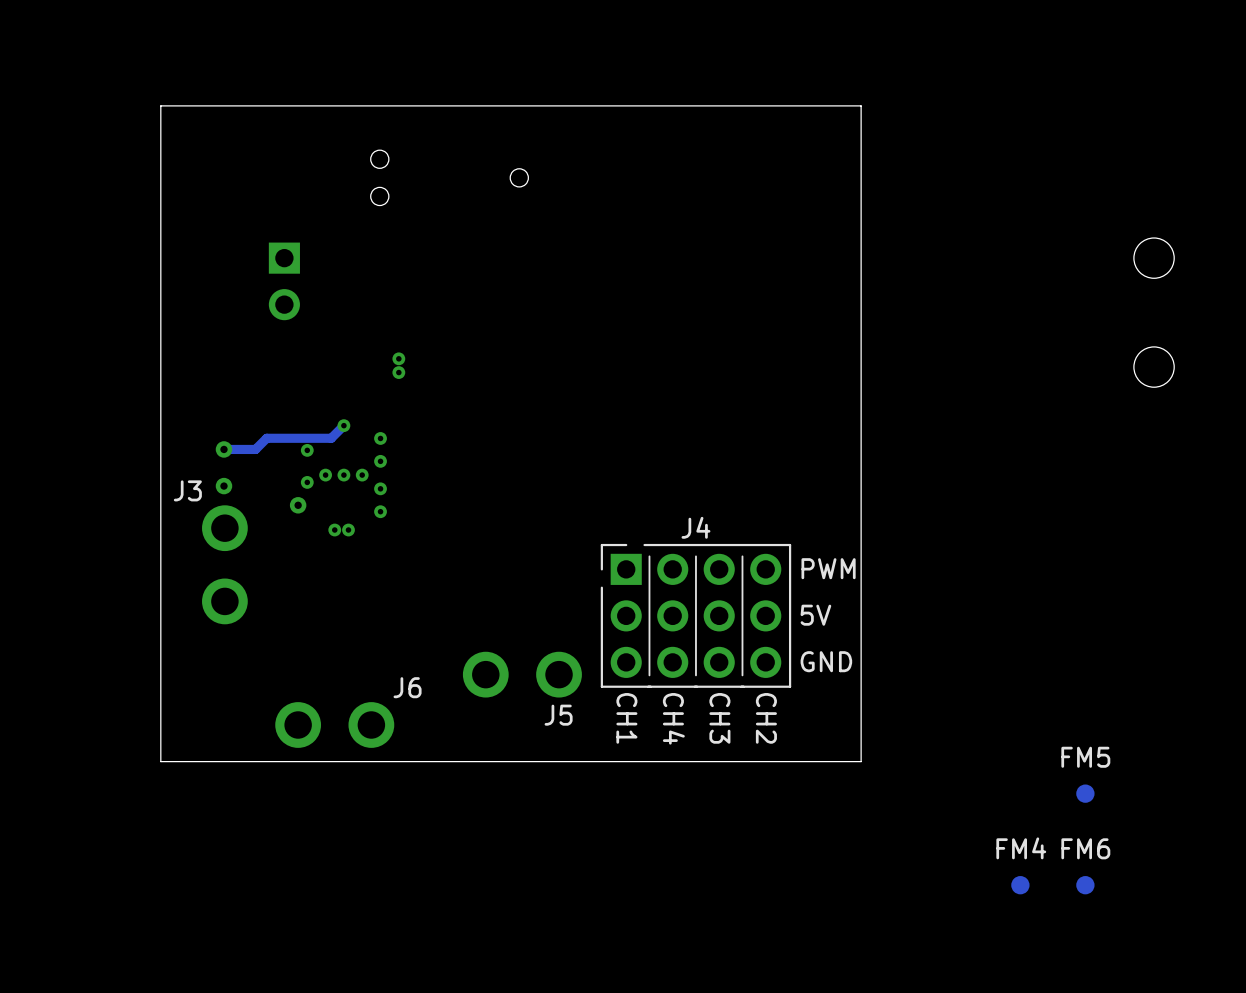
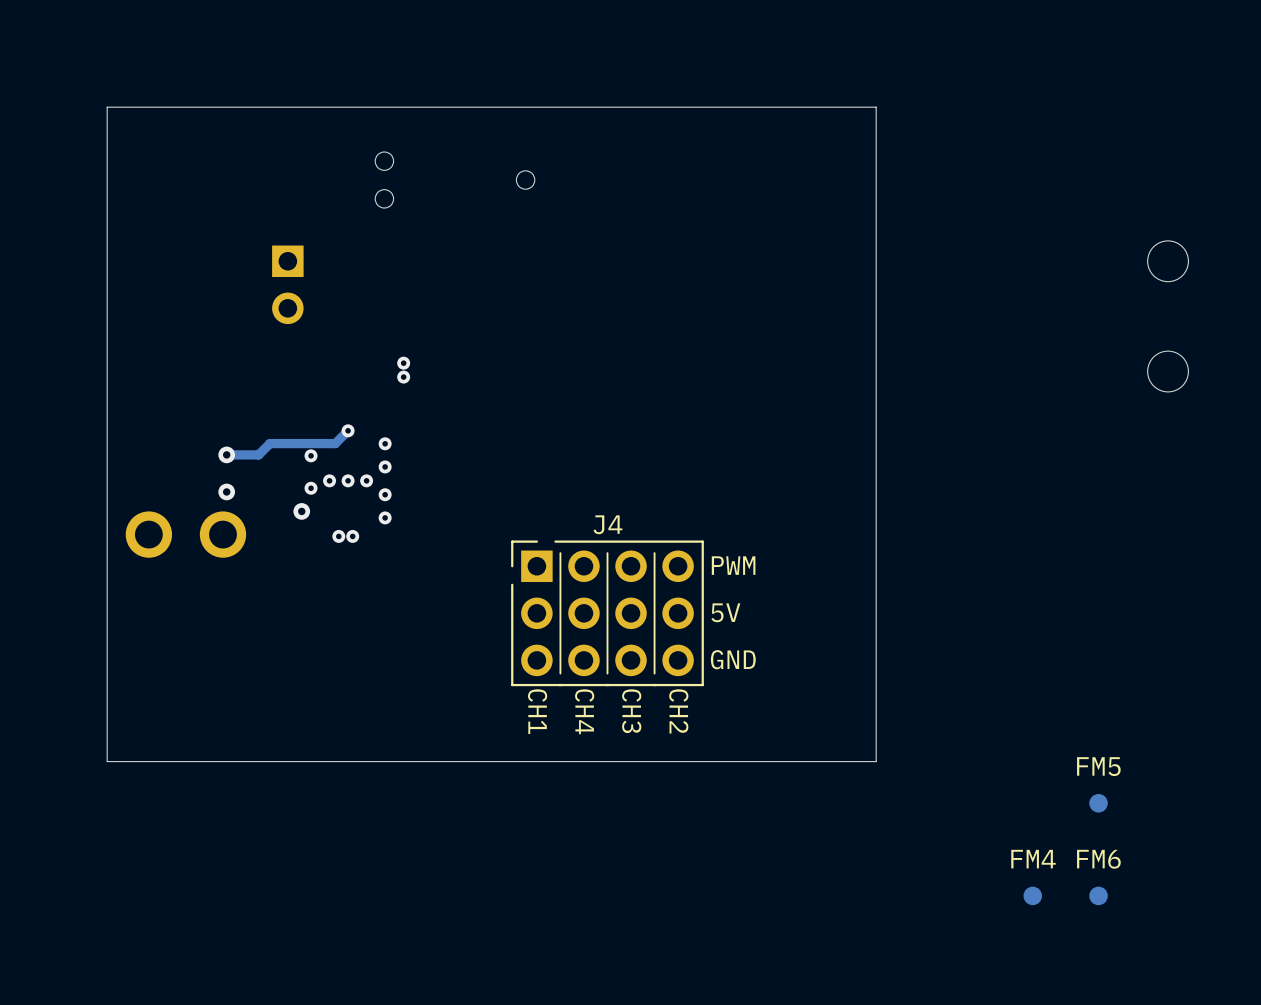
board edge: (861, 105) (861, 761) (160, 761) (160, 105) -> (871, 107) (876, 107) (876, 761) (107, 761) (107, 107) (162, 107)
line: (649, 556) (649, 675) -> (560, 553) (560, 673)
line: (695, 556) (695, 675) -> (607, 553) (607, 673)
line: (742, 556) (742, 675) -> (654, 553) (654, 673)
J3 side: bottom (224, 564) -> top (185, 534)
text position: PWM (828, 568) -> PWM (733, 565)
J4 position: (695, 615) -> (607, 613)
text position: 5V (815, 615) -> 5V (725, 612)
text position: GND (826, 661) -> GND (733, 659)
J5: (522, 674) -> none
text position: CH1 (626, 718) -> CH1 (537, 711)
text position: CH4 (673, 718) -> CH4 (584, 711)
text position: CH3 (719, 718) -> CH3 (631, 711)
text position: CH2 (766, 718) -> CH2 (678, 711)
J6: (334, 724) -> none

